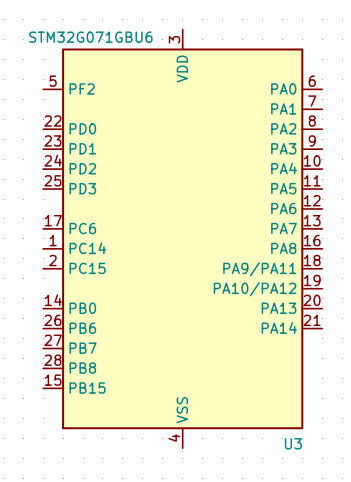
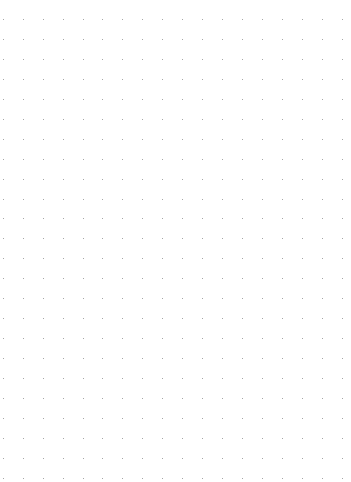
U3: STM32G071GBU6 (182, 238) -> none

